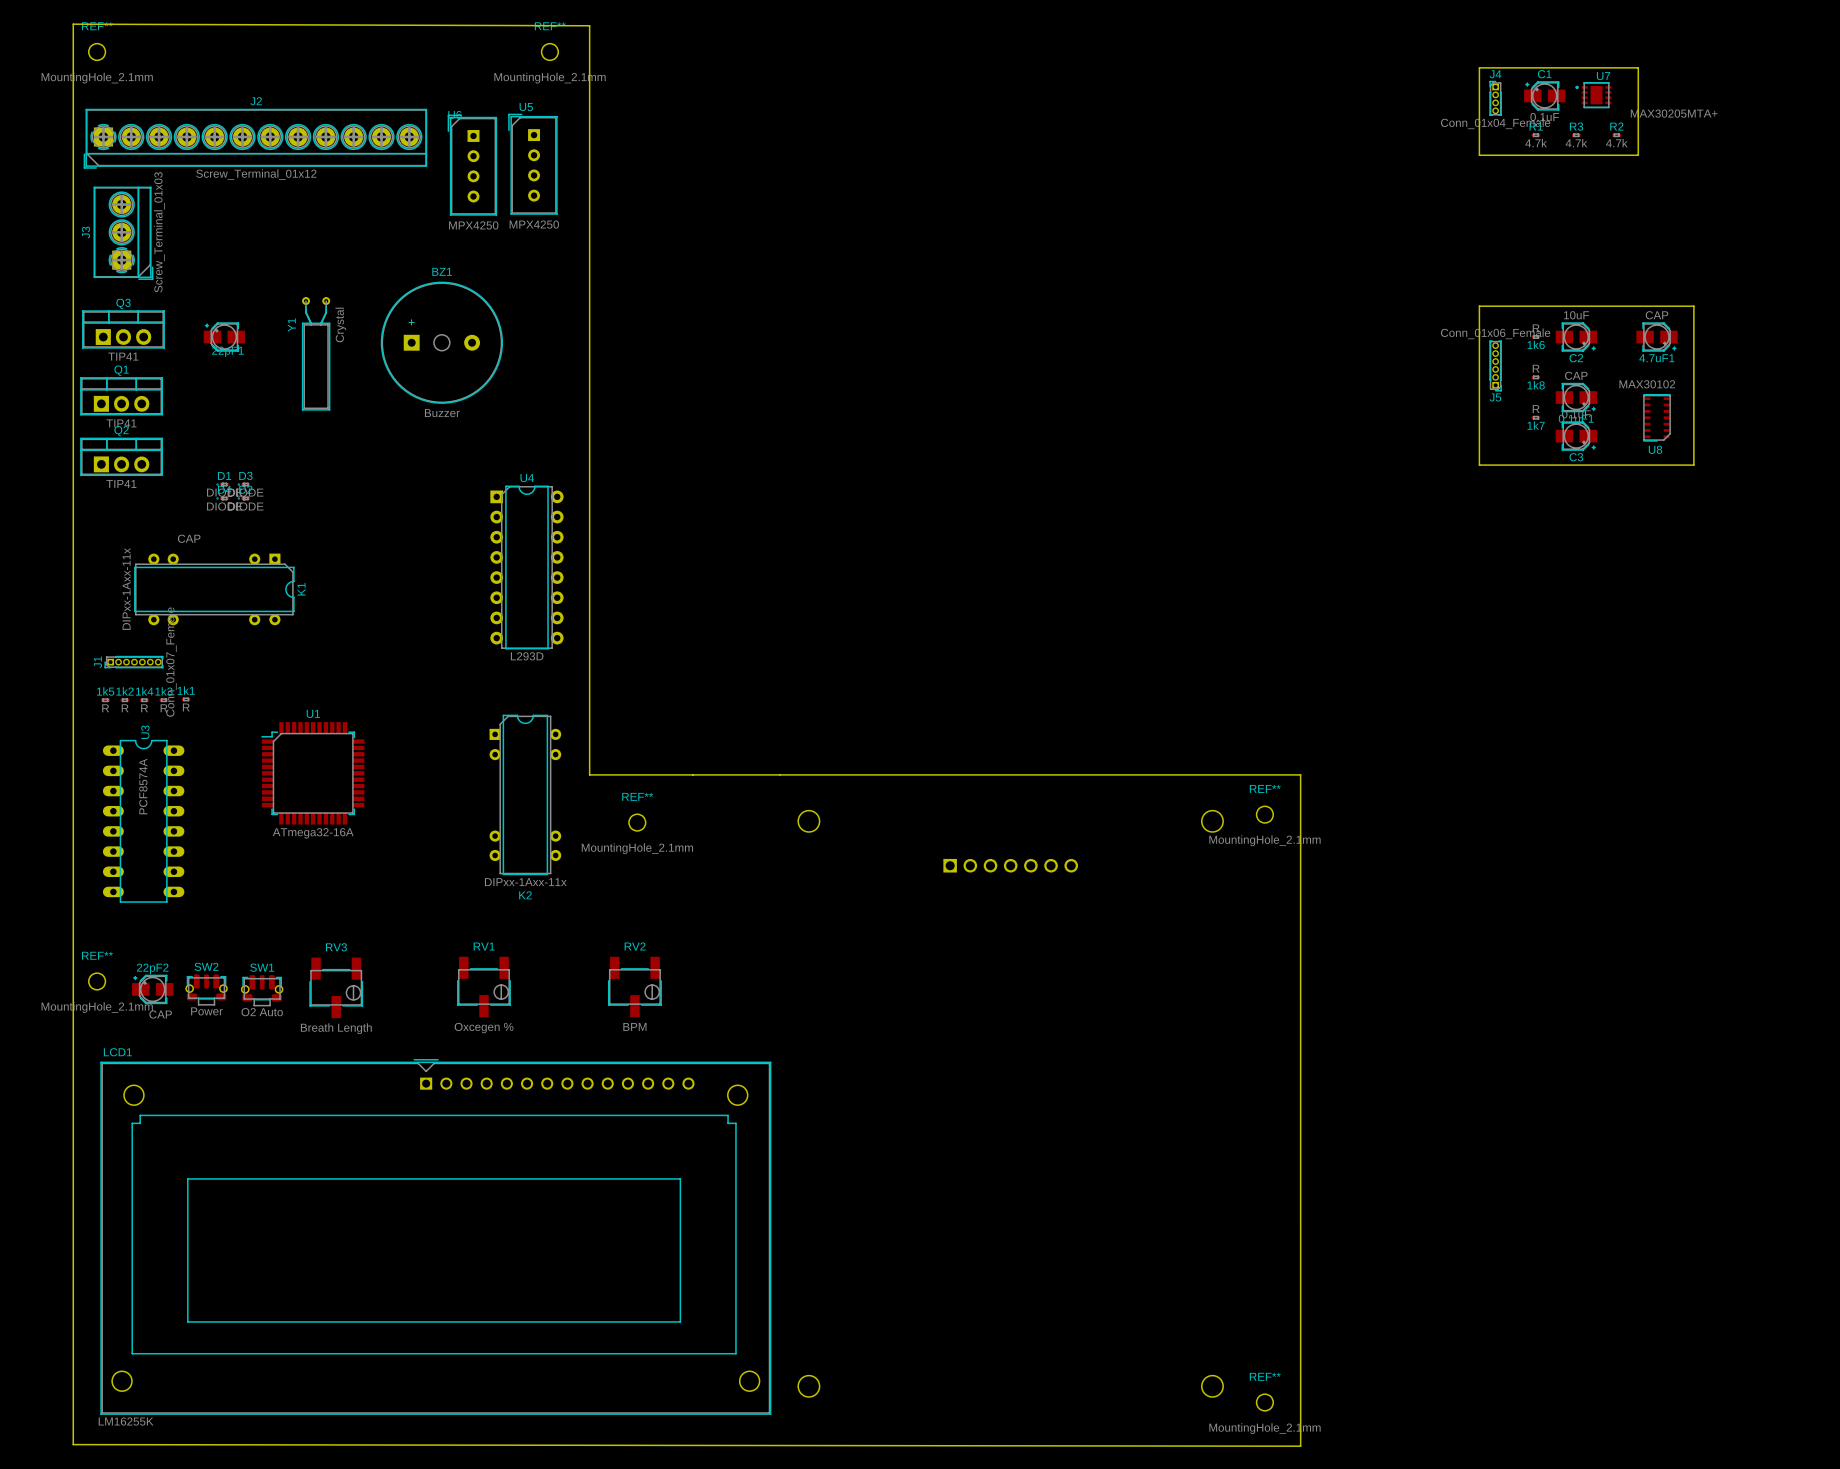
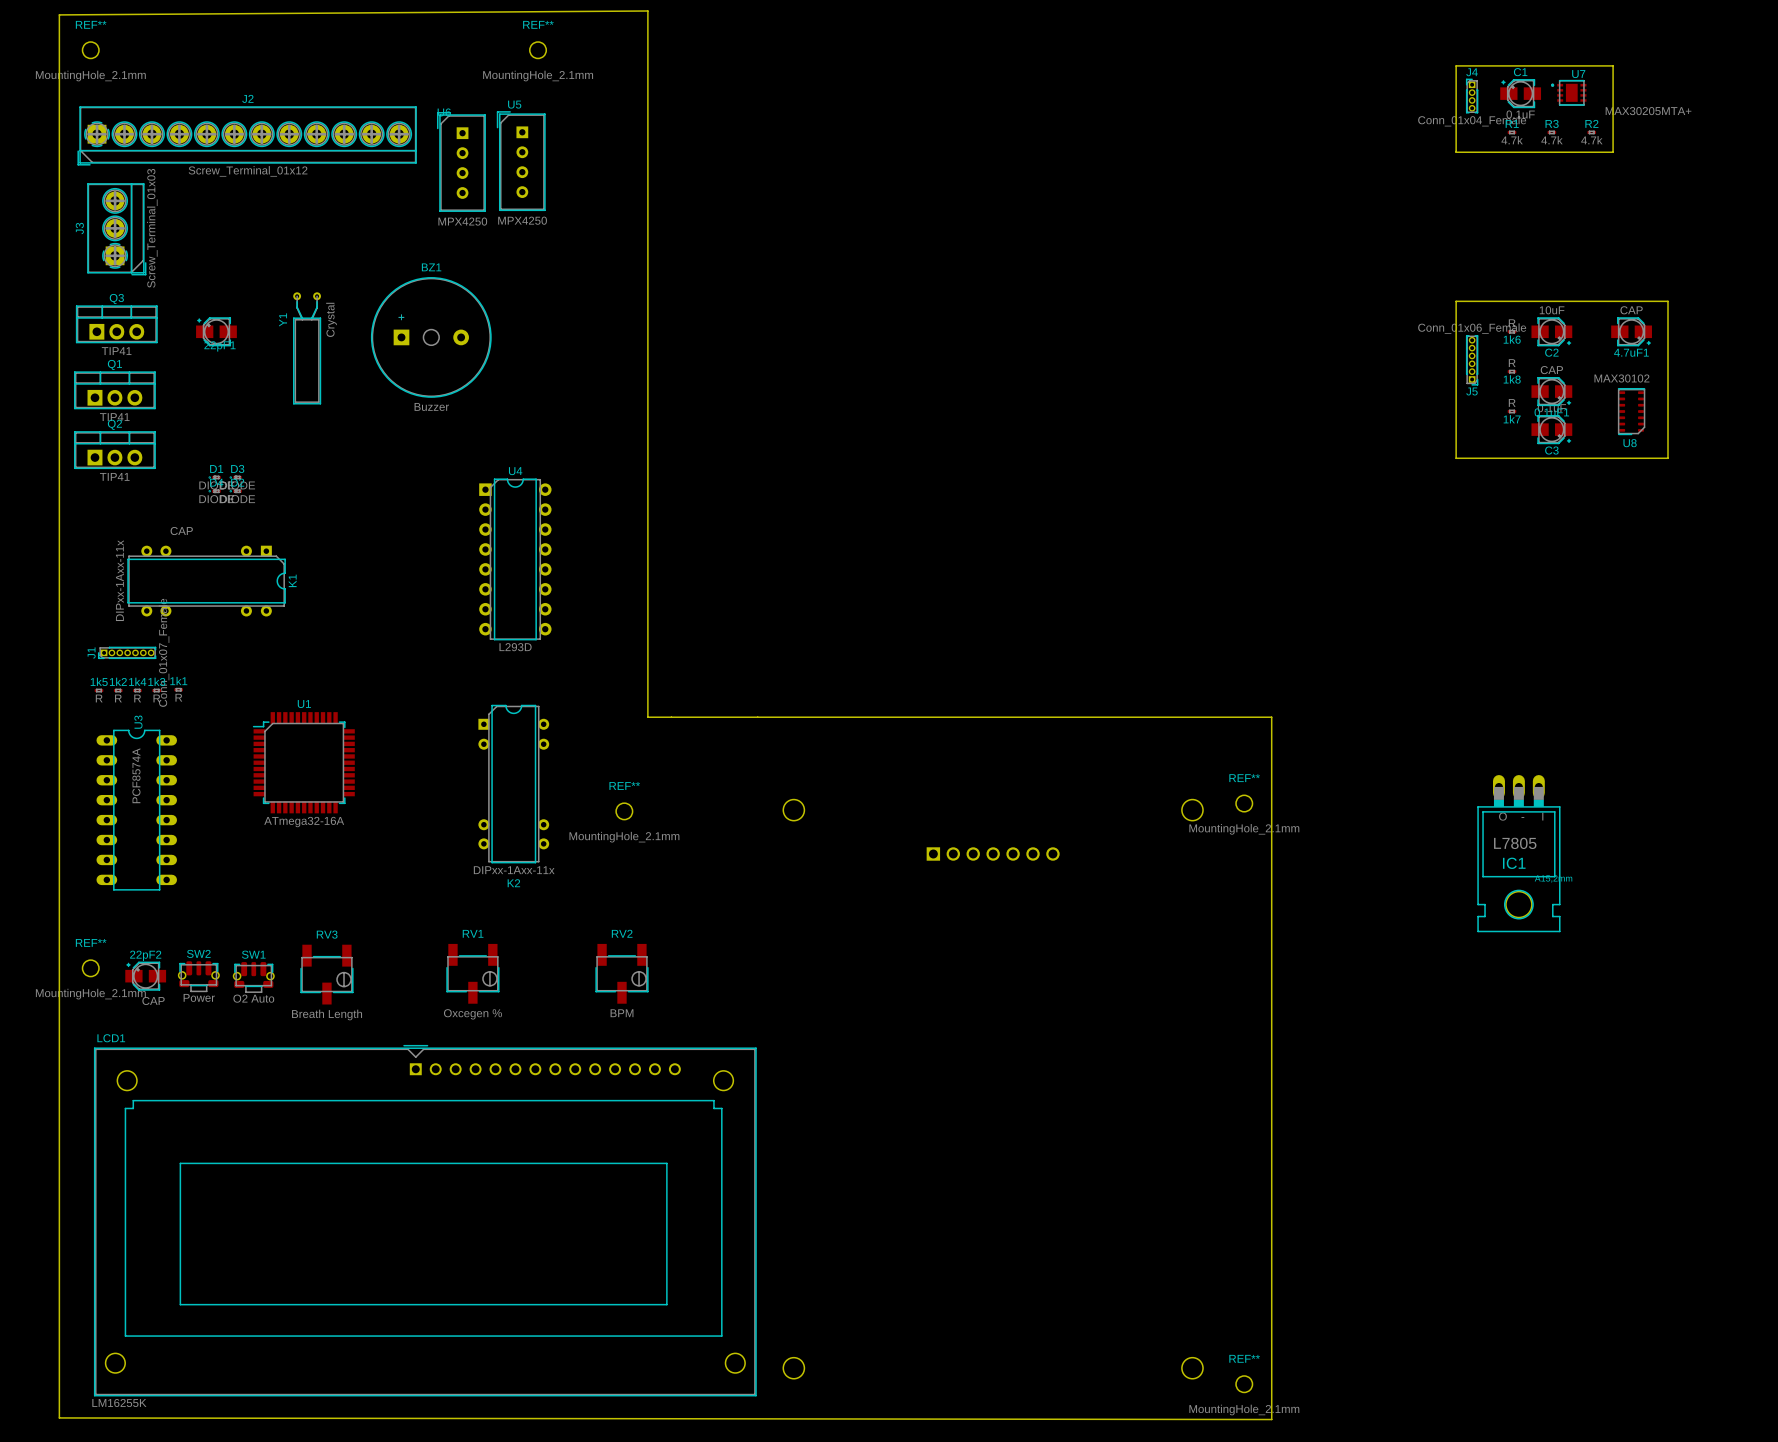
board edge: (73, 24) (73, 1444) (1300, 1446) (1300, 774) (589, 774) (589, 25) (73, 24) -> (647, 10) (59, 14) (59, 1417) (1271, 1419) (1271, 717) (647, 717) (647, 10)
IC1: none -> L7805 (1518, 853)

